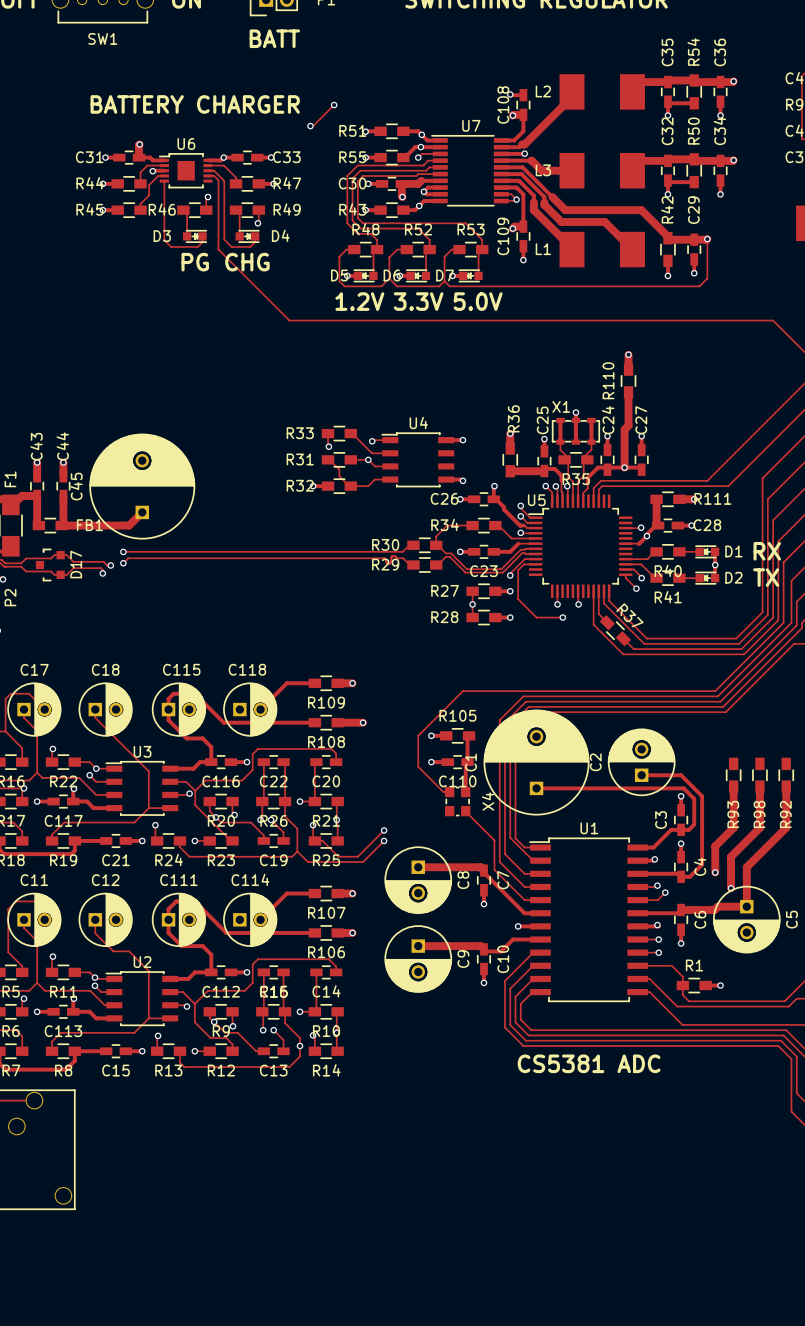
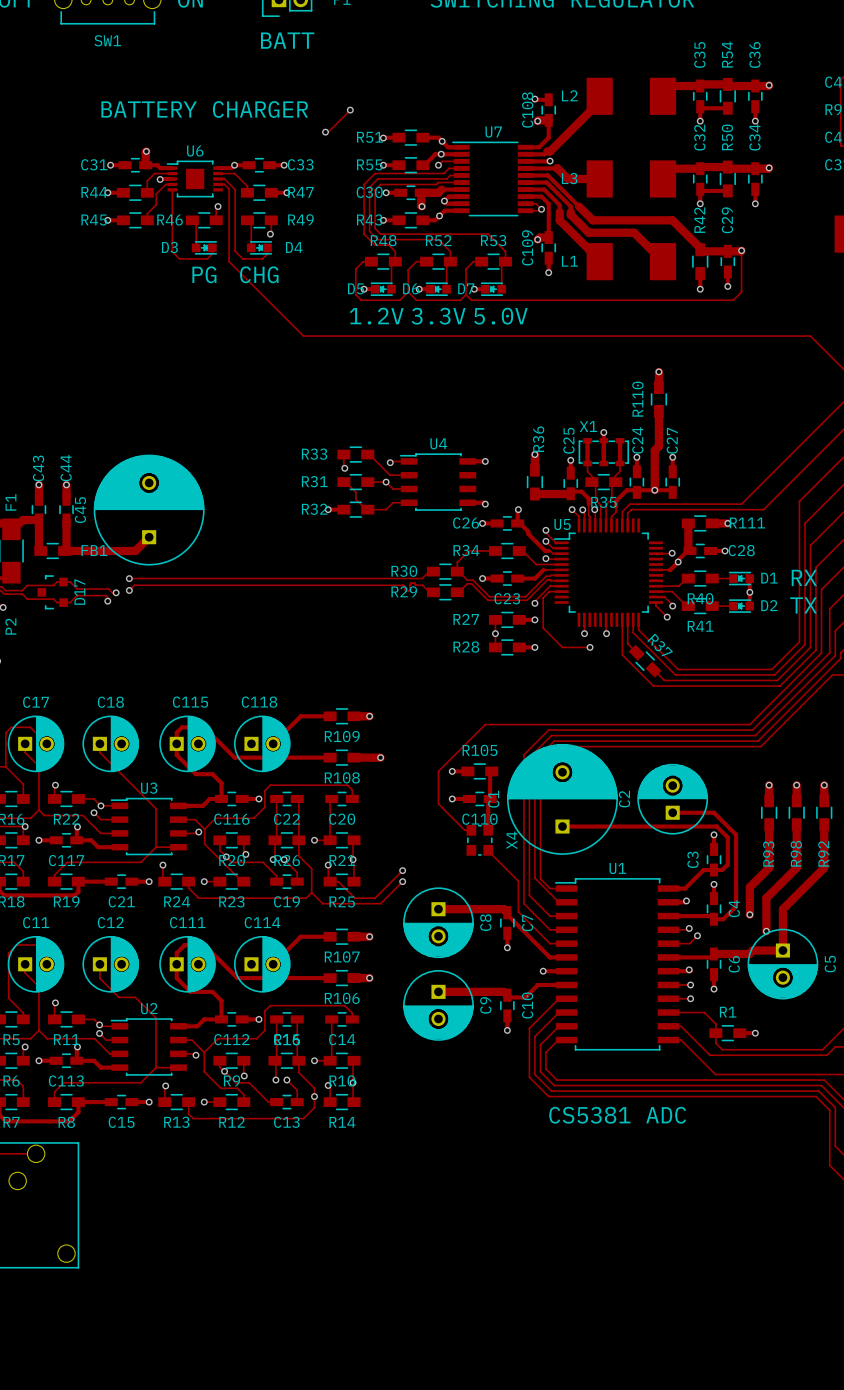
track: none -> (769, 785) (769, 800)
via: none -> (769, 785)
track: none -> (796, 785) (796, 800)
via: none -> (796, 785)
track: none -> (824, 785) (824, 800)
via: none -> (824, 785)

